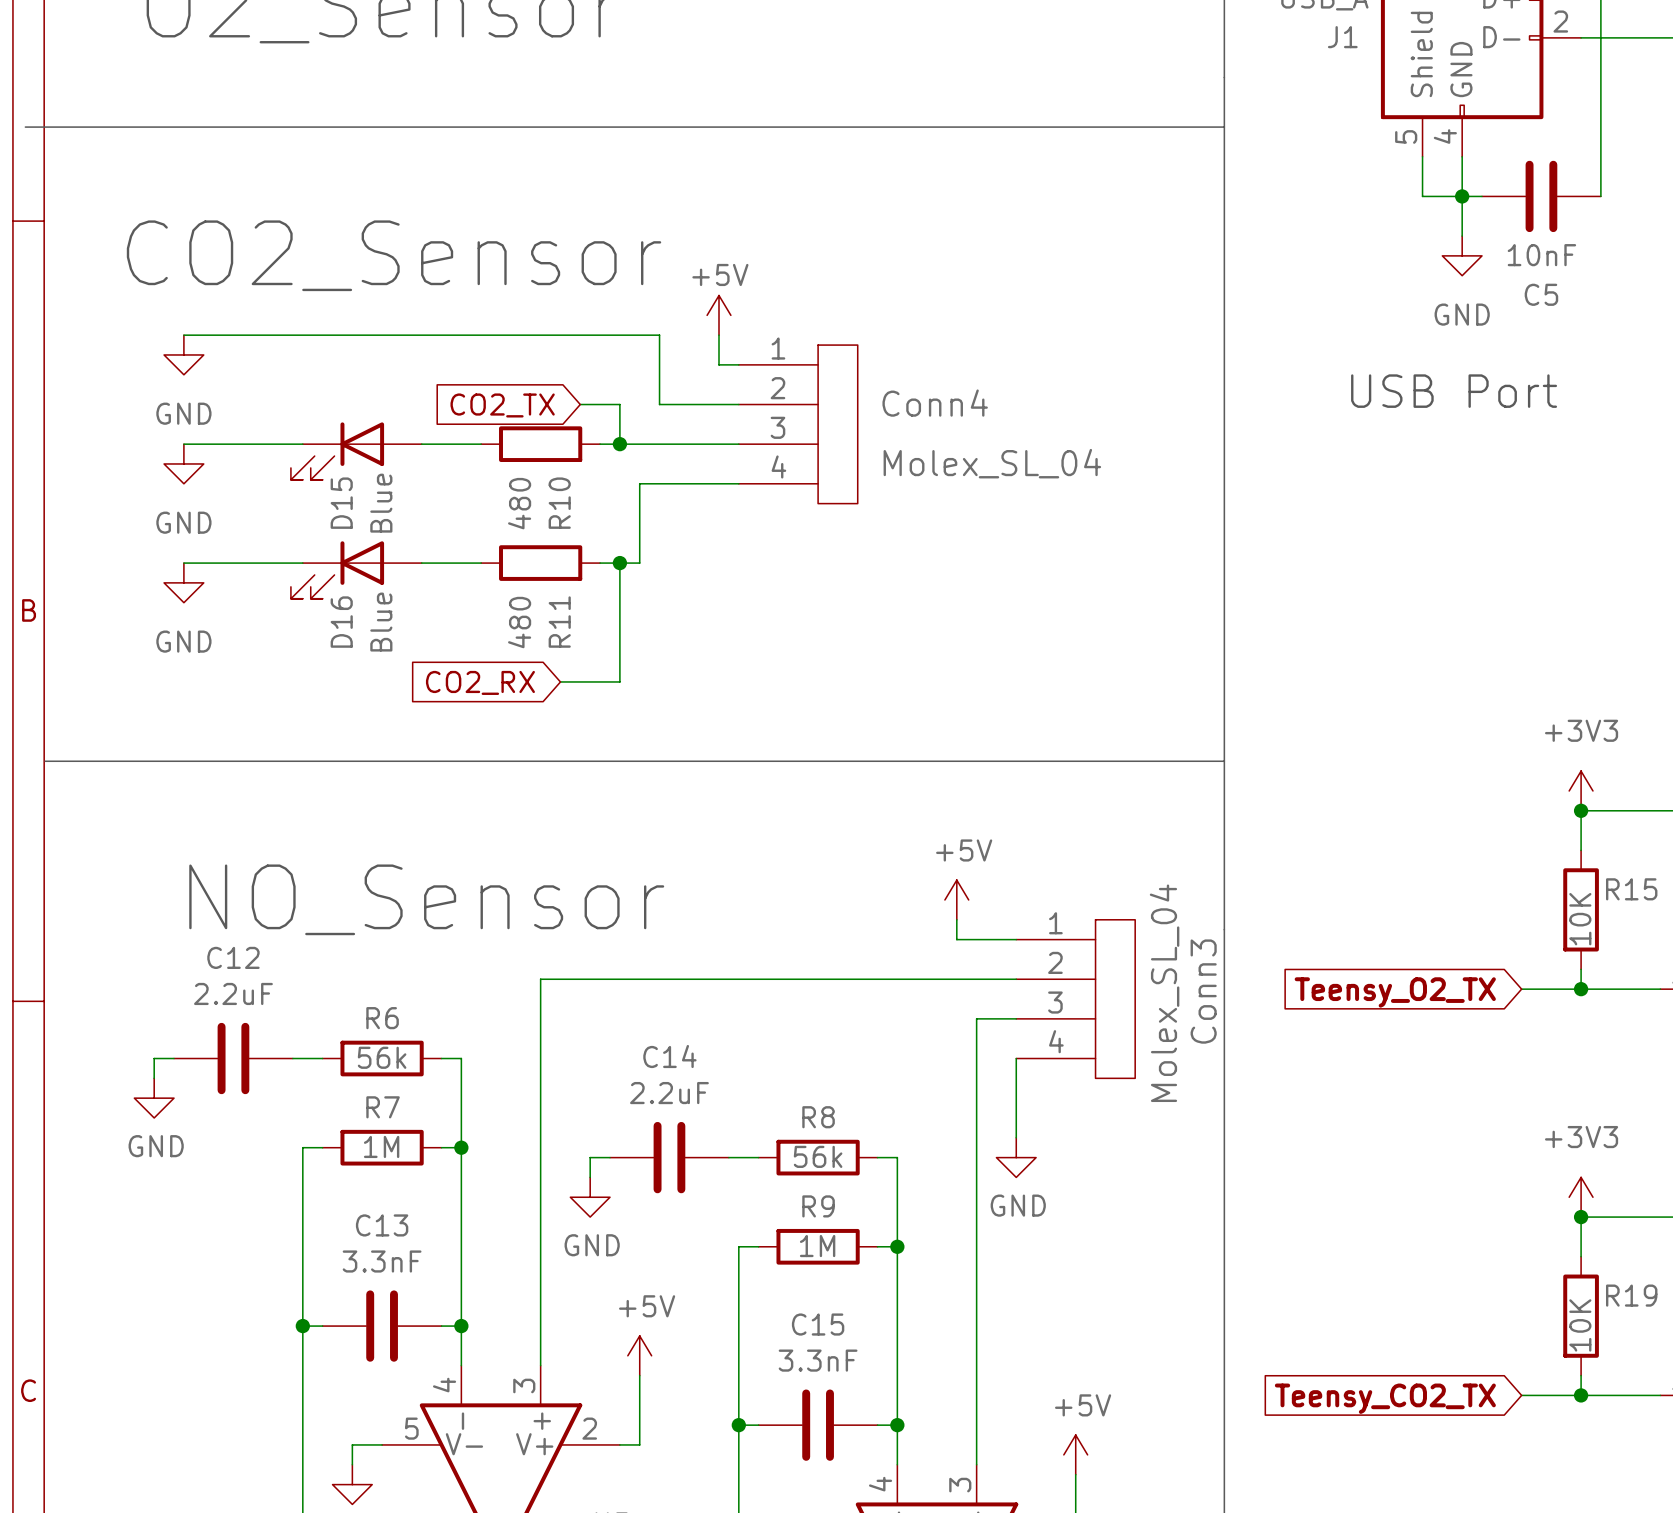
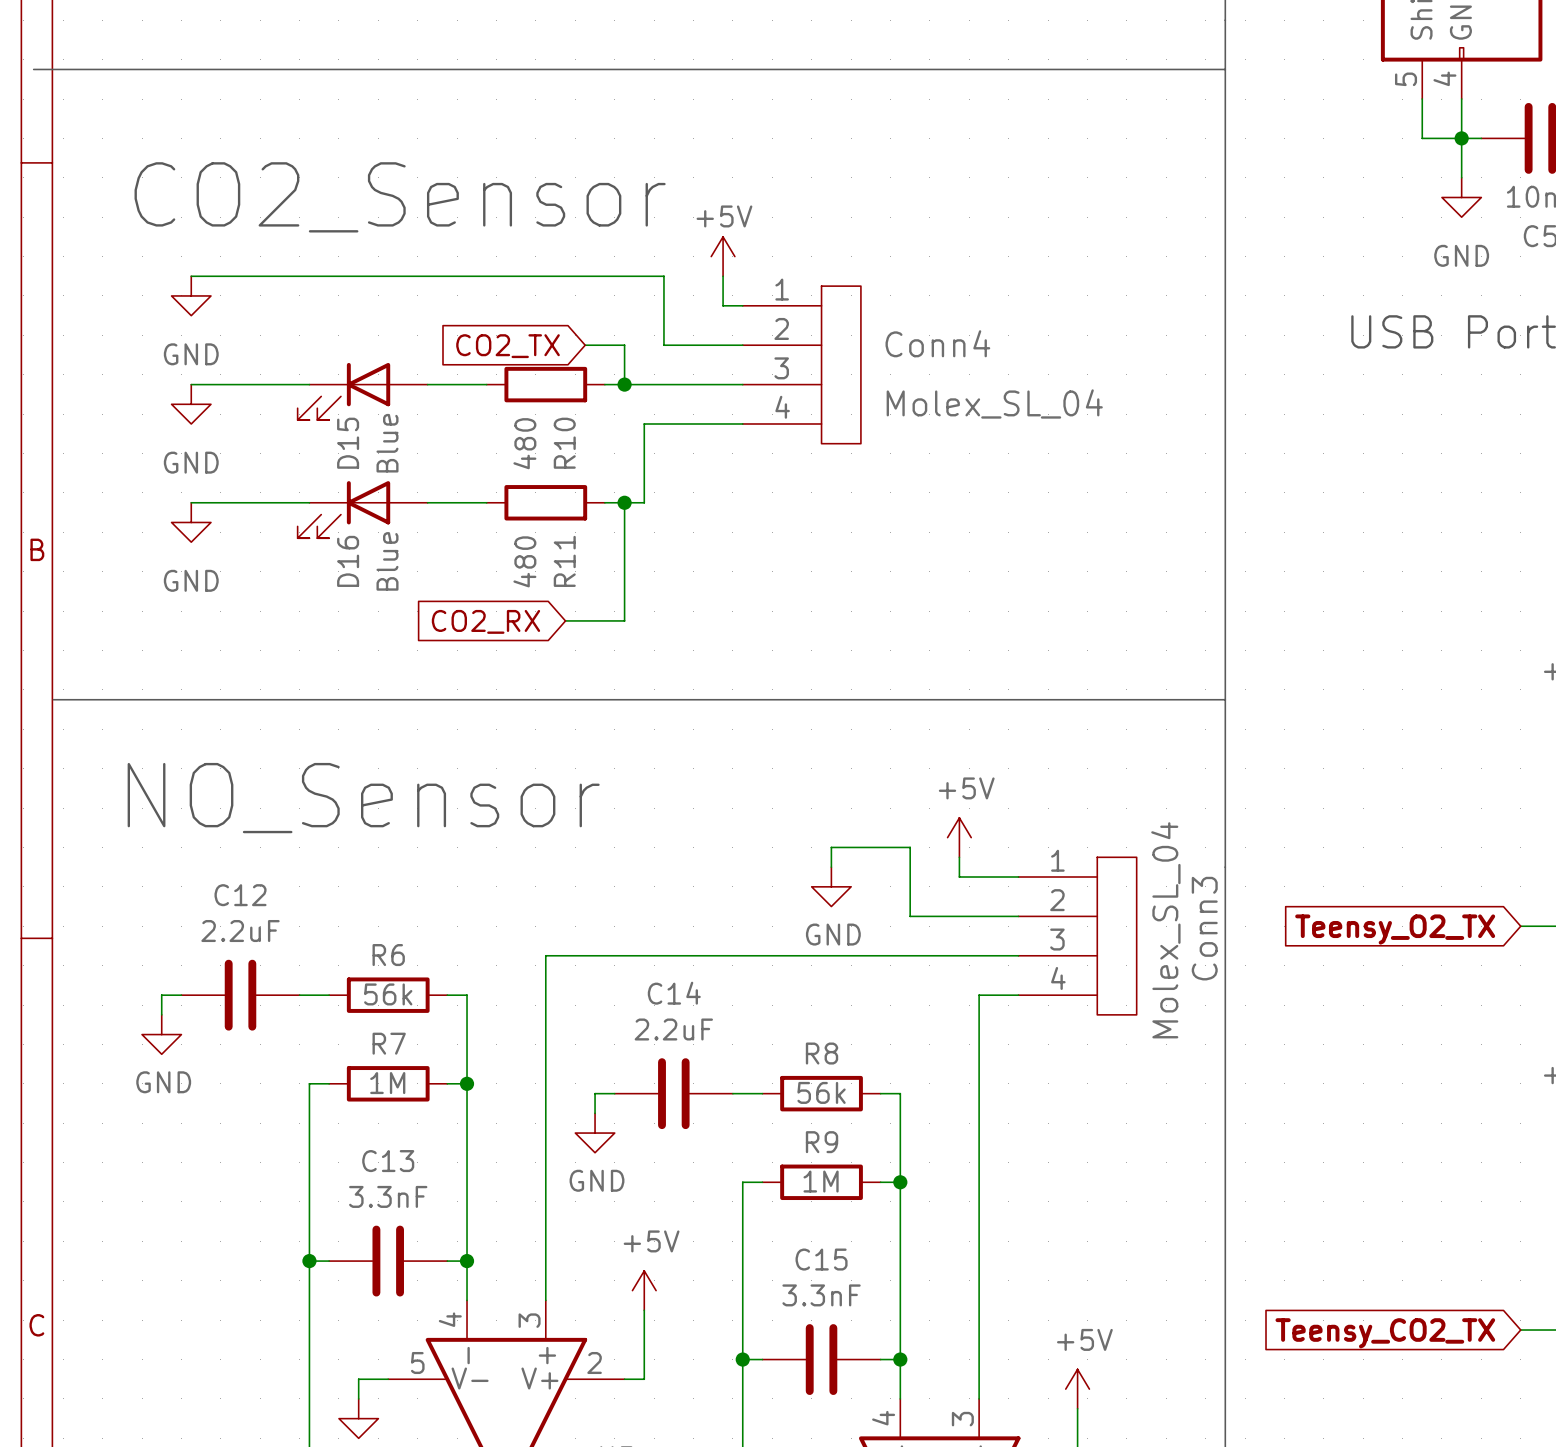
text position: NO_Sensor (426, 899) -> NO_Sensor (363, 798)
wire: none -> (831, 867) (831, 847) (910, 847) (910, 916)
wire: (907, 979) (540, 979) (540, 1018) -> (979, 955) (545, 955)
wire: (976, 1018) (976, 1058) -> (1018, 995) (979, 995)
wire: (1016, 1058) (1016, 1137) -> none
power symbol position: GND (1016, 1157) -> GND (831, 886)

